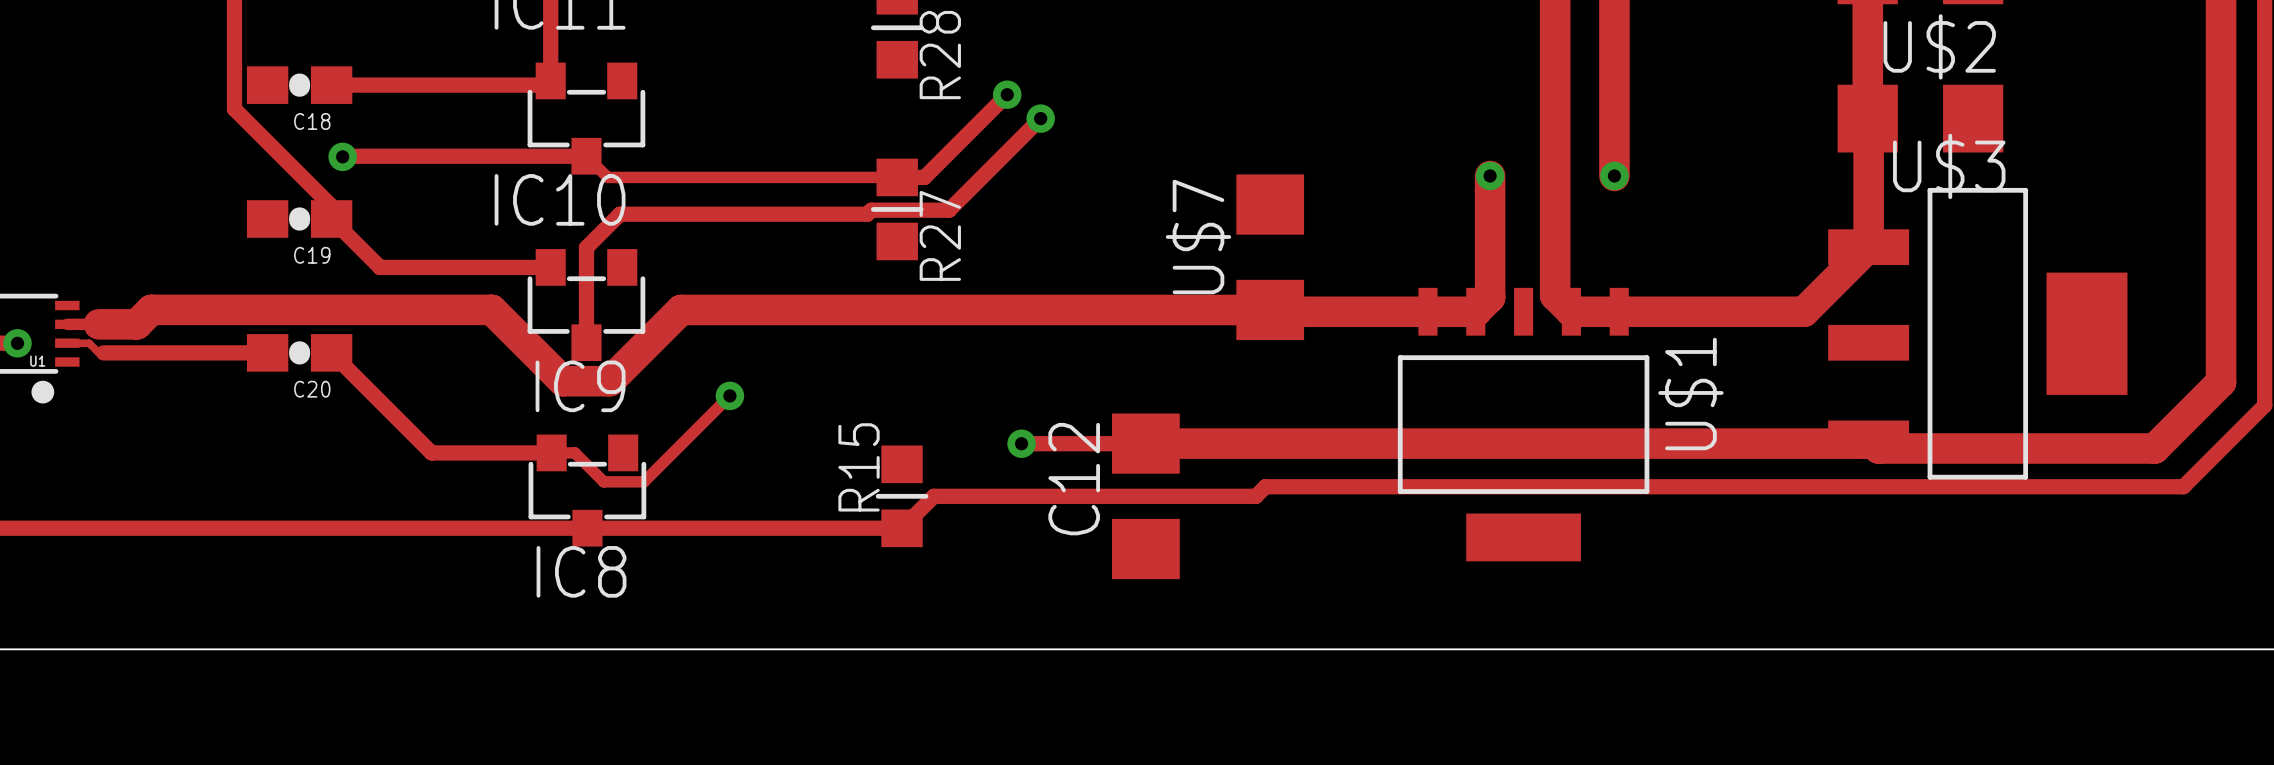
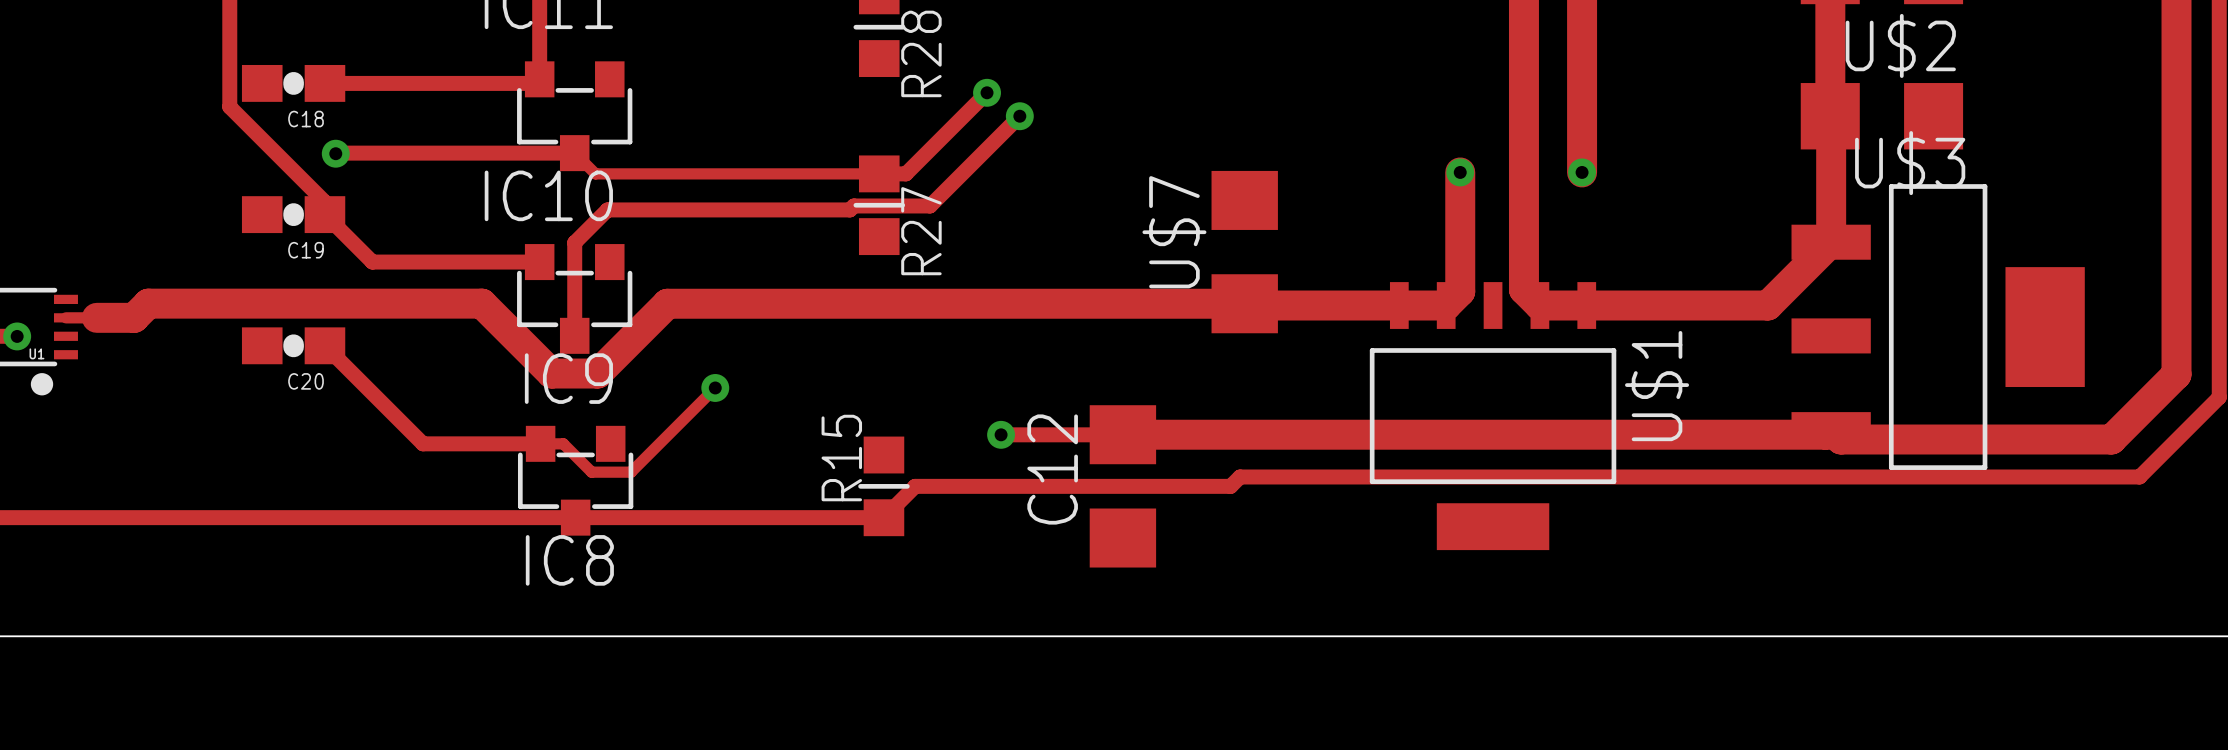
track: (67, 343) (89, 343) (98, 352) (267, 352) -> none

